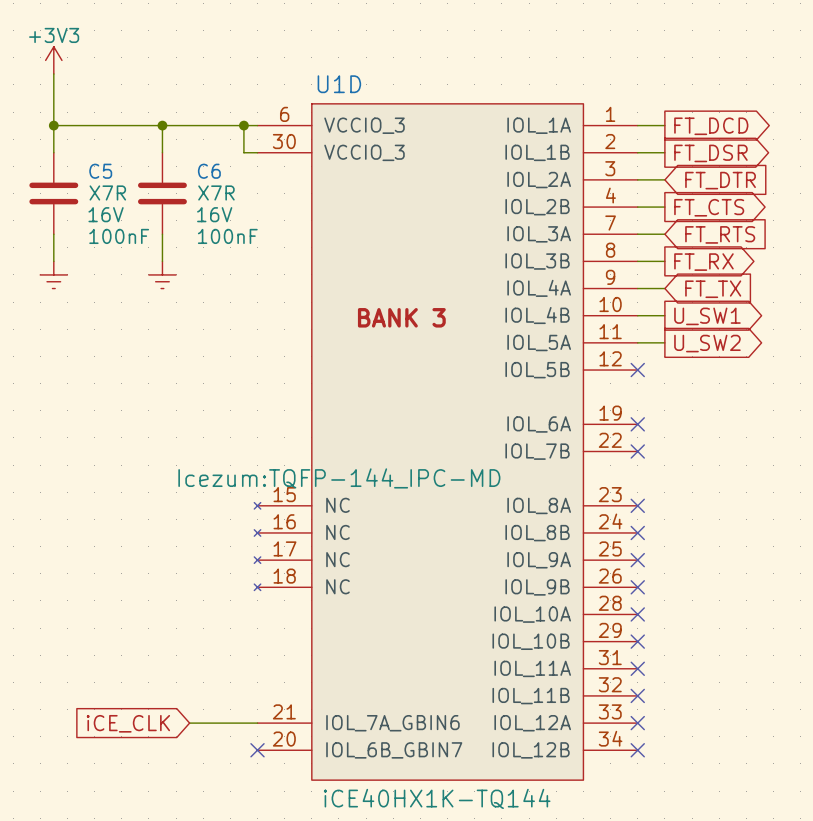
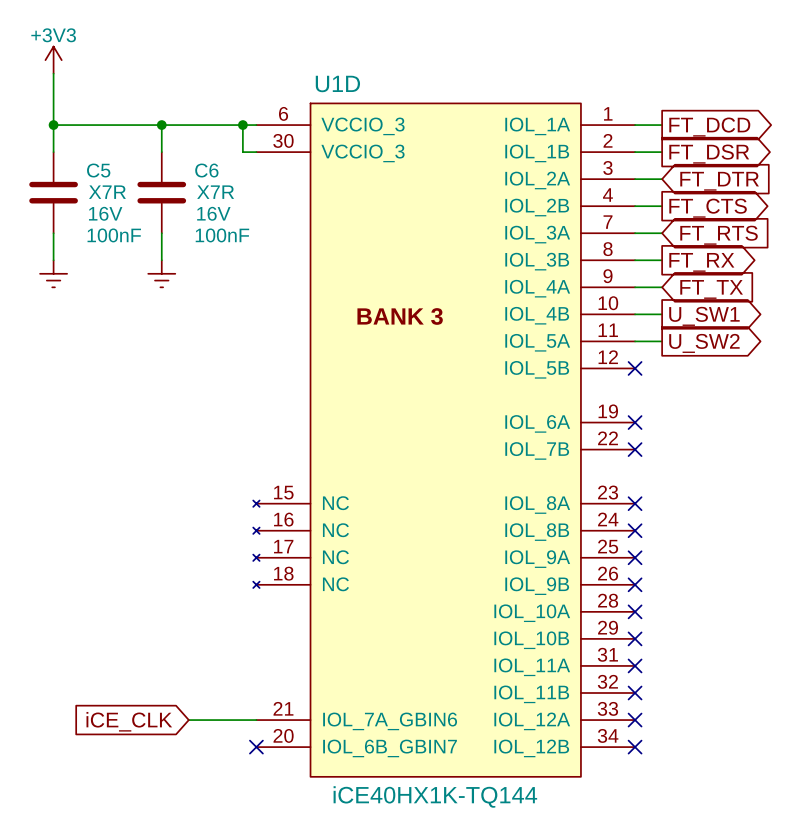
U1D text: Icezum:TQFP-144_IPC-MD (339, 478) -> none

